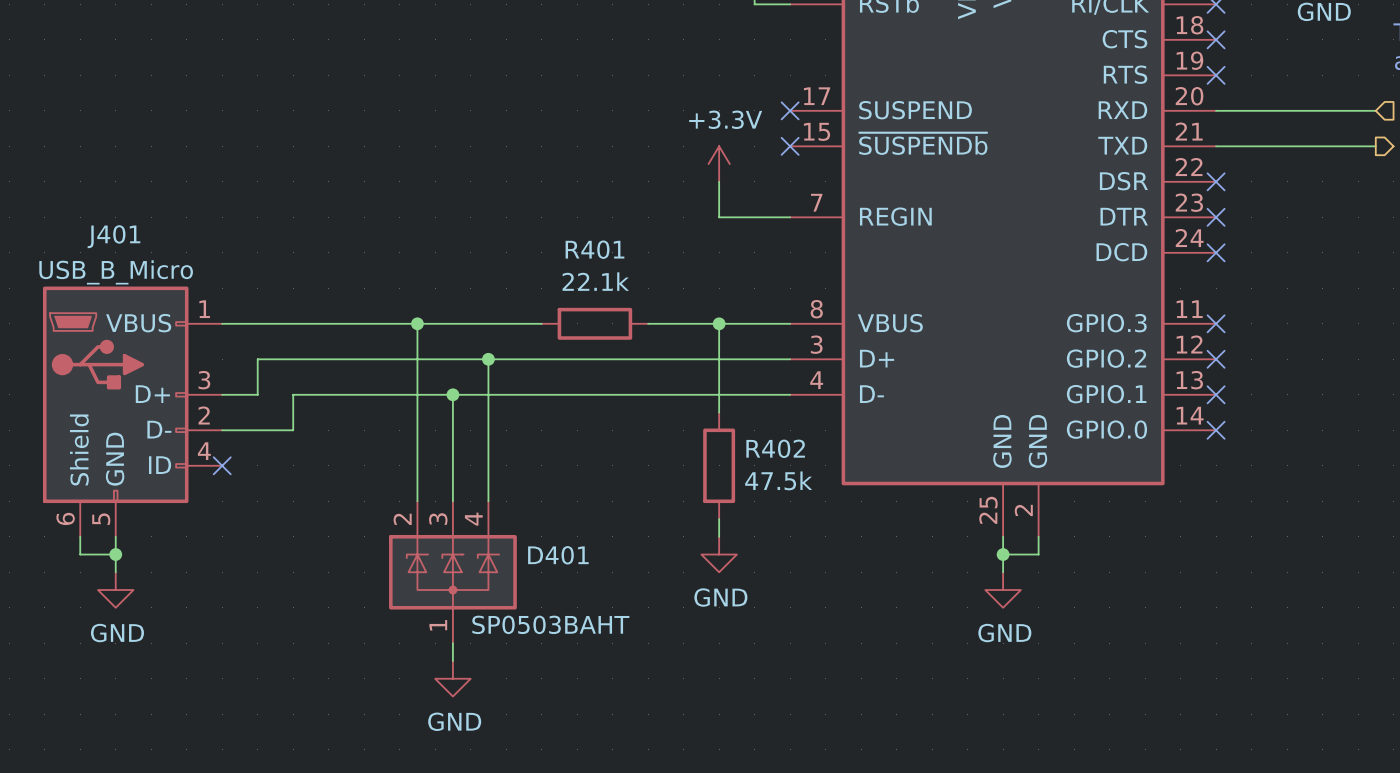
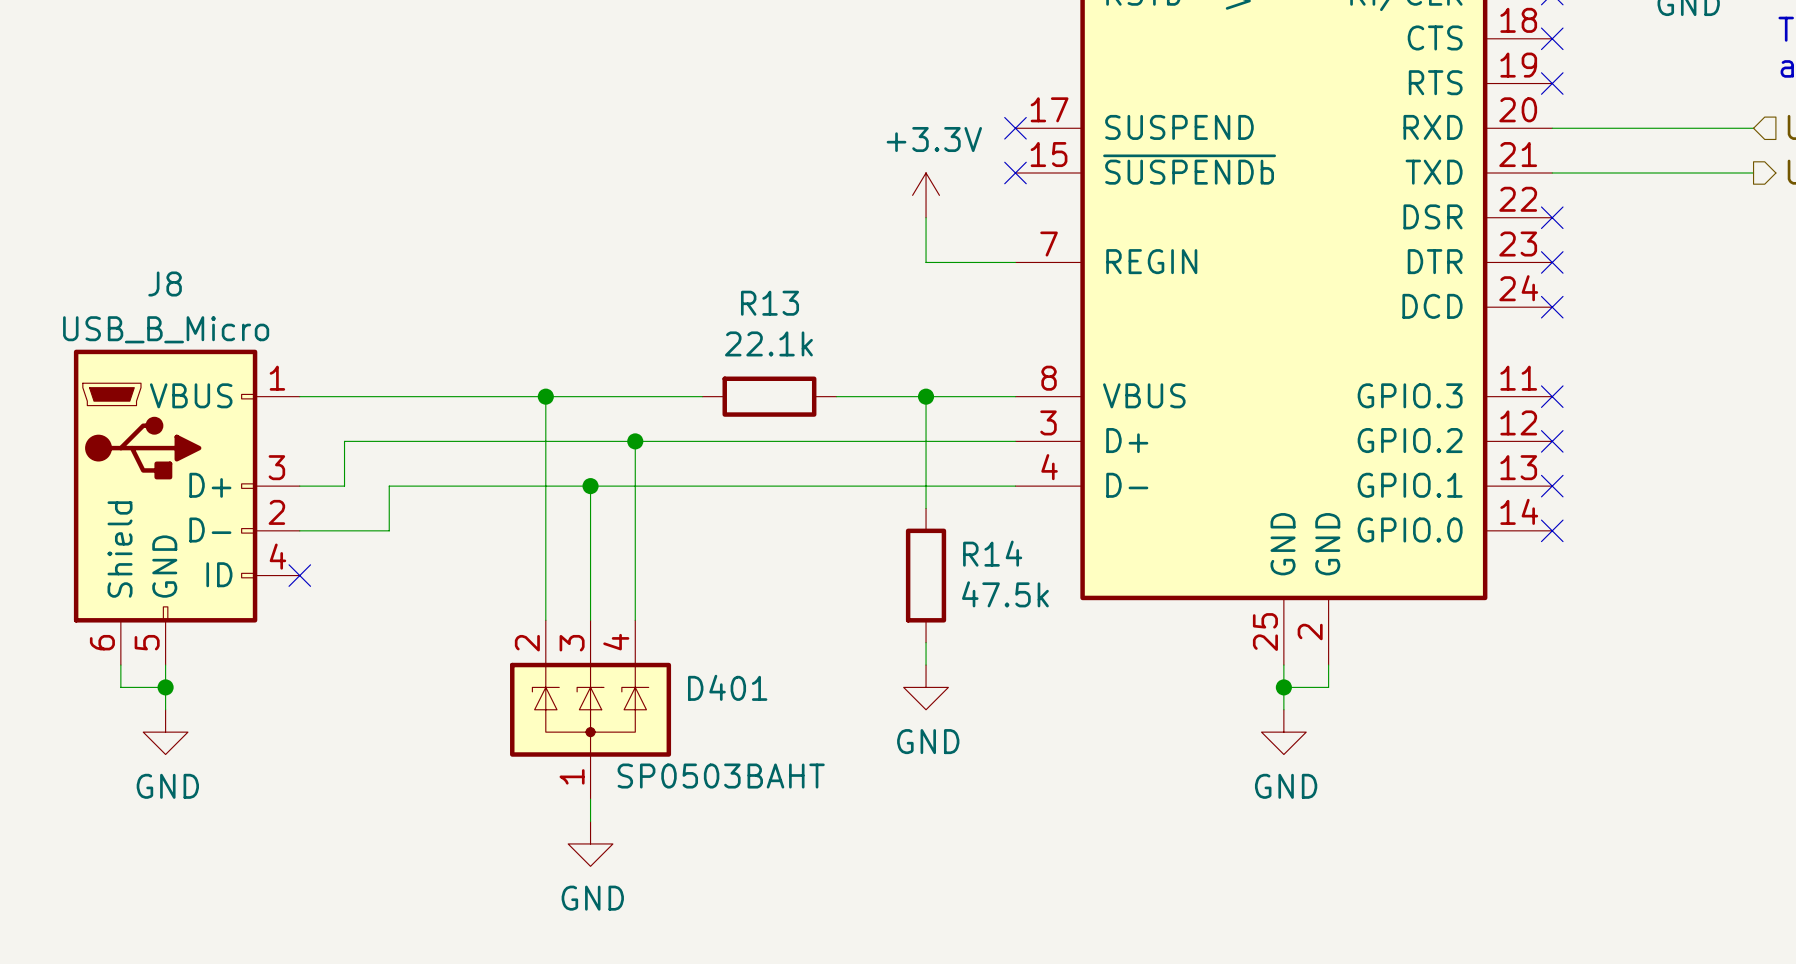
J401 name: J401 (113, 236) -> J8 (165, 283)
R401 name: R401 (594, 249) -> R13 (770, 303)
R402 name: R402 (775, 448) -> R14 (992, 553)

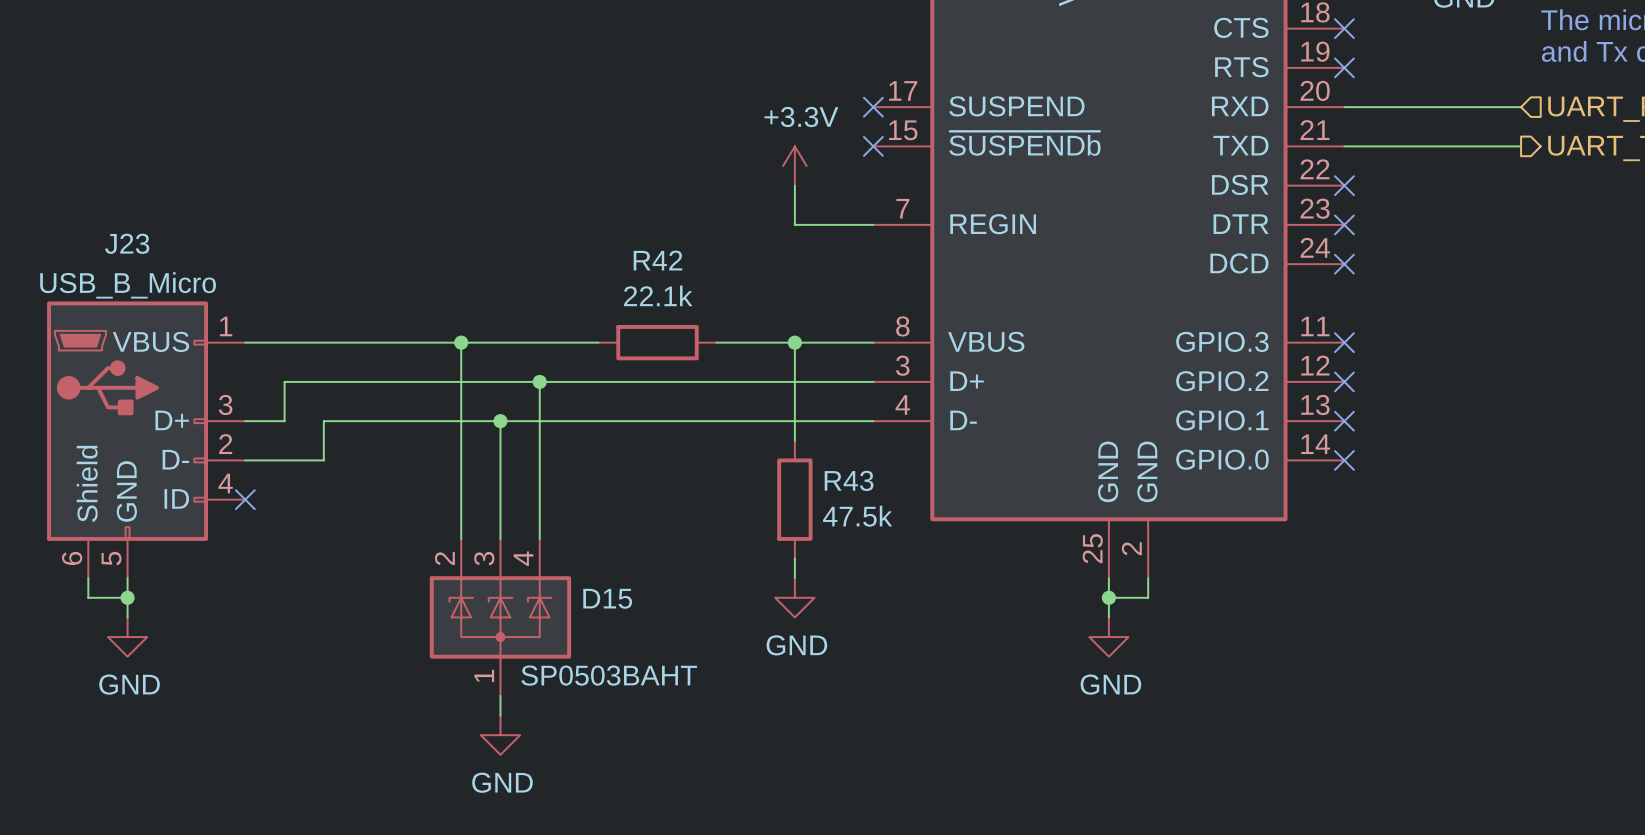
J8 name: J8 (165, 283) -> J23 (127, 243)
R13 name: R13 (770, 303) -> R42 (657, 260)
R14 name: R14 (992, 553) -> R43 (849, 480)
D401 name: D401 (727, 687) -> D15 (607, 598)

